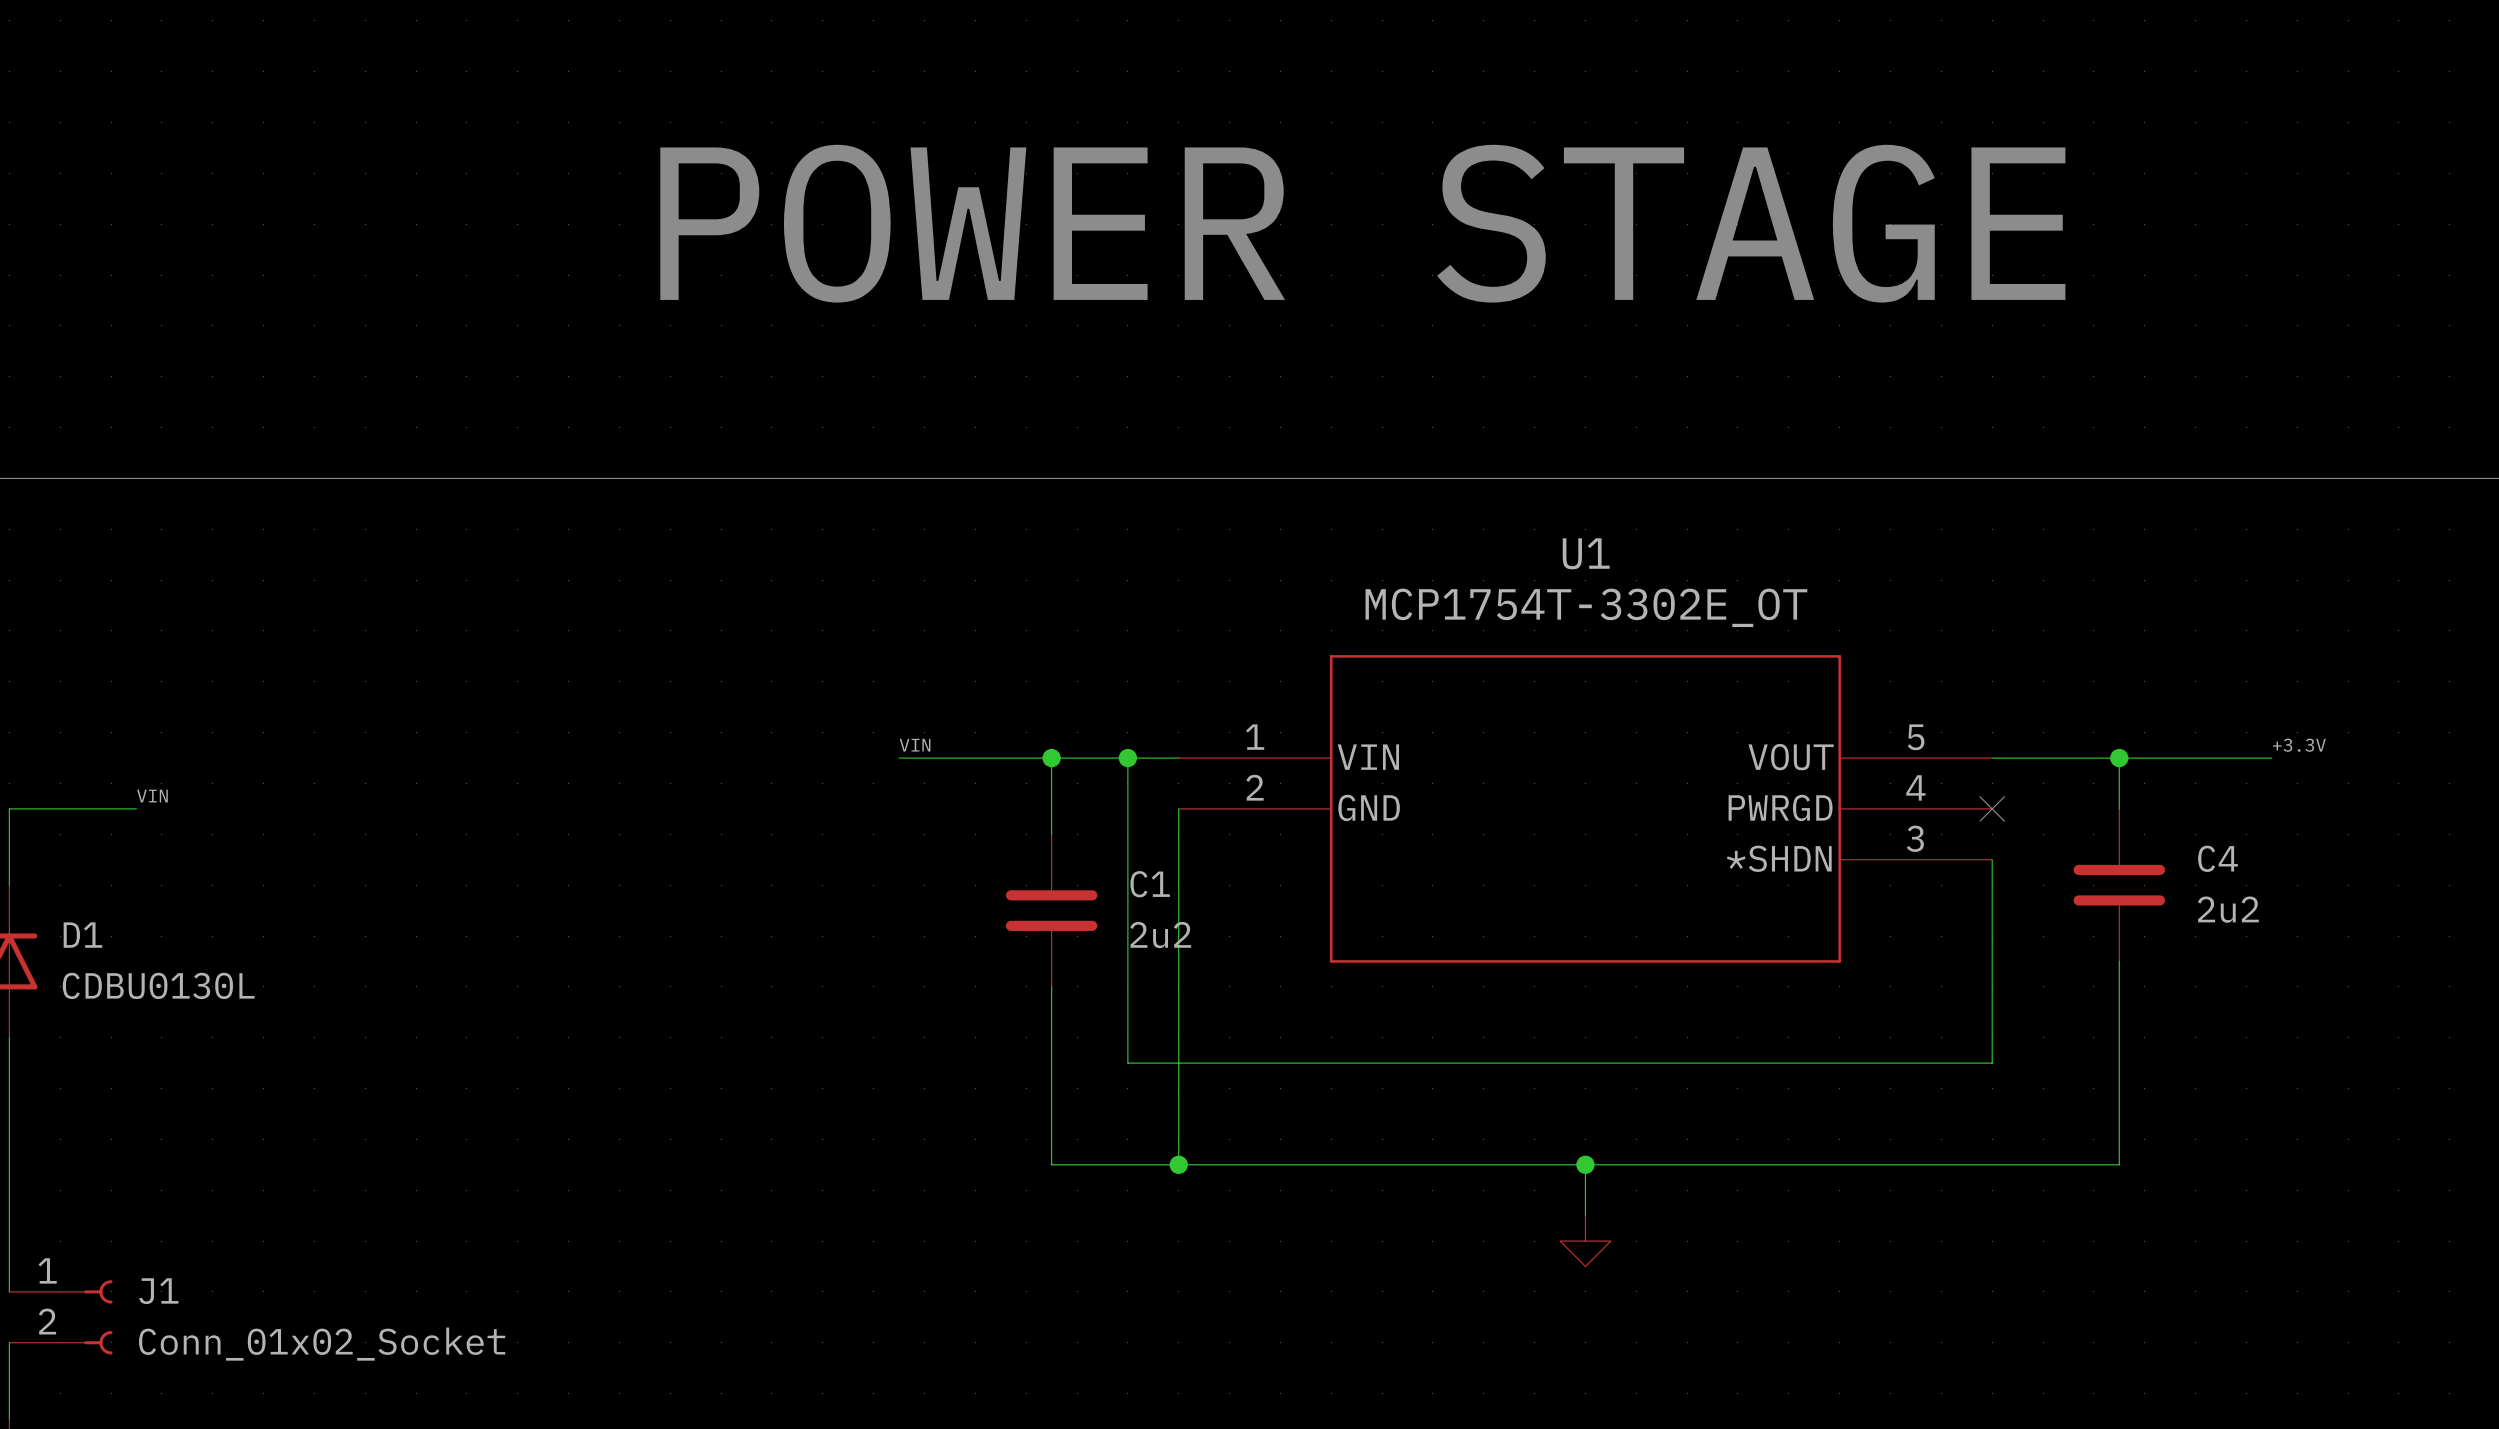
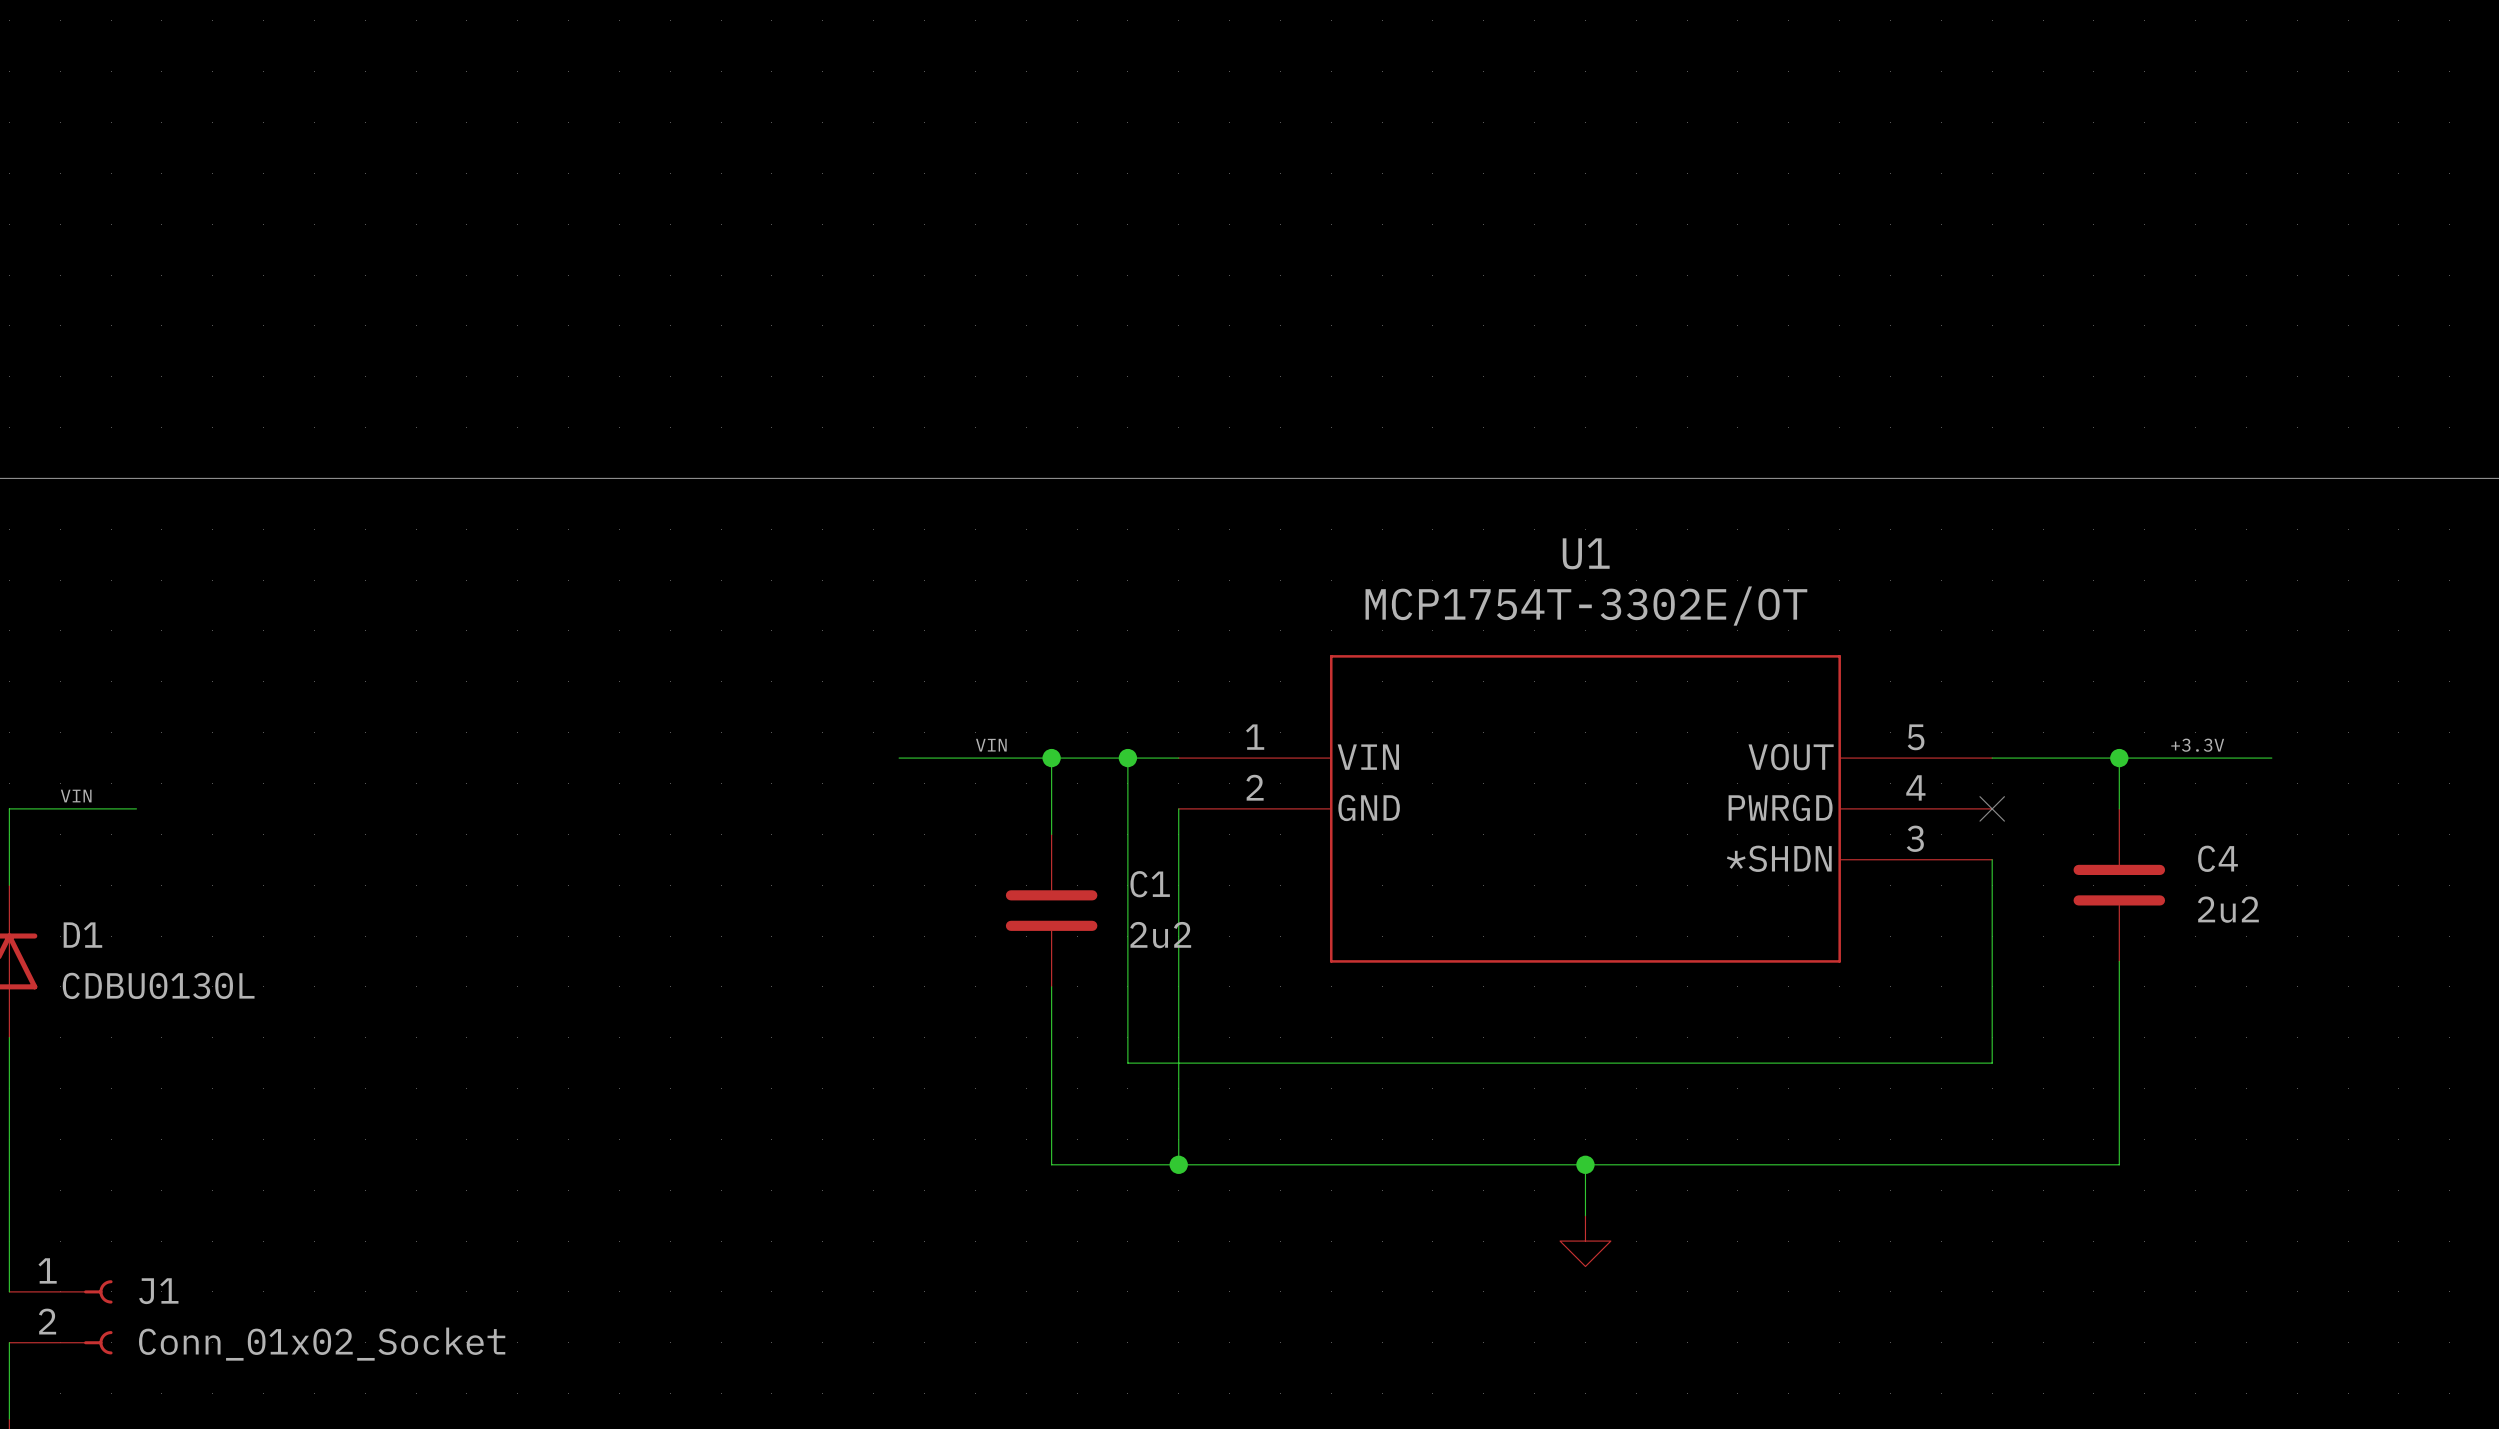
text: POWER STAGE (1362, 223) -> none
U1 value: MCP1754T-3302E_OT (1586, 607) -> MCP1754T-3302E/OT (1586, 606)
label position: VIN (915, 745) -> VIN (991, 745)
label position: +3.3V (2299, 745) -> +3.3V (2197, 745)
label position: VIN (152, 796) -> VIN (76, 796)

